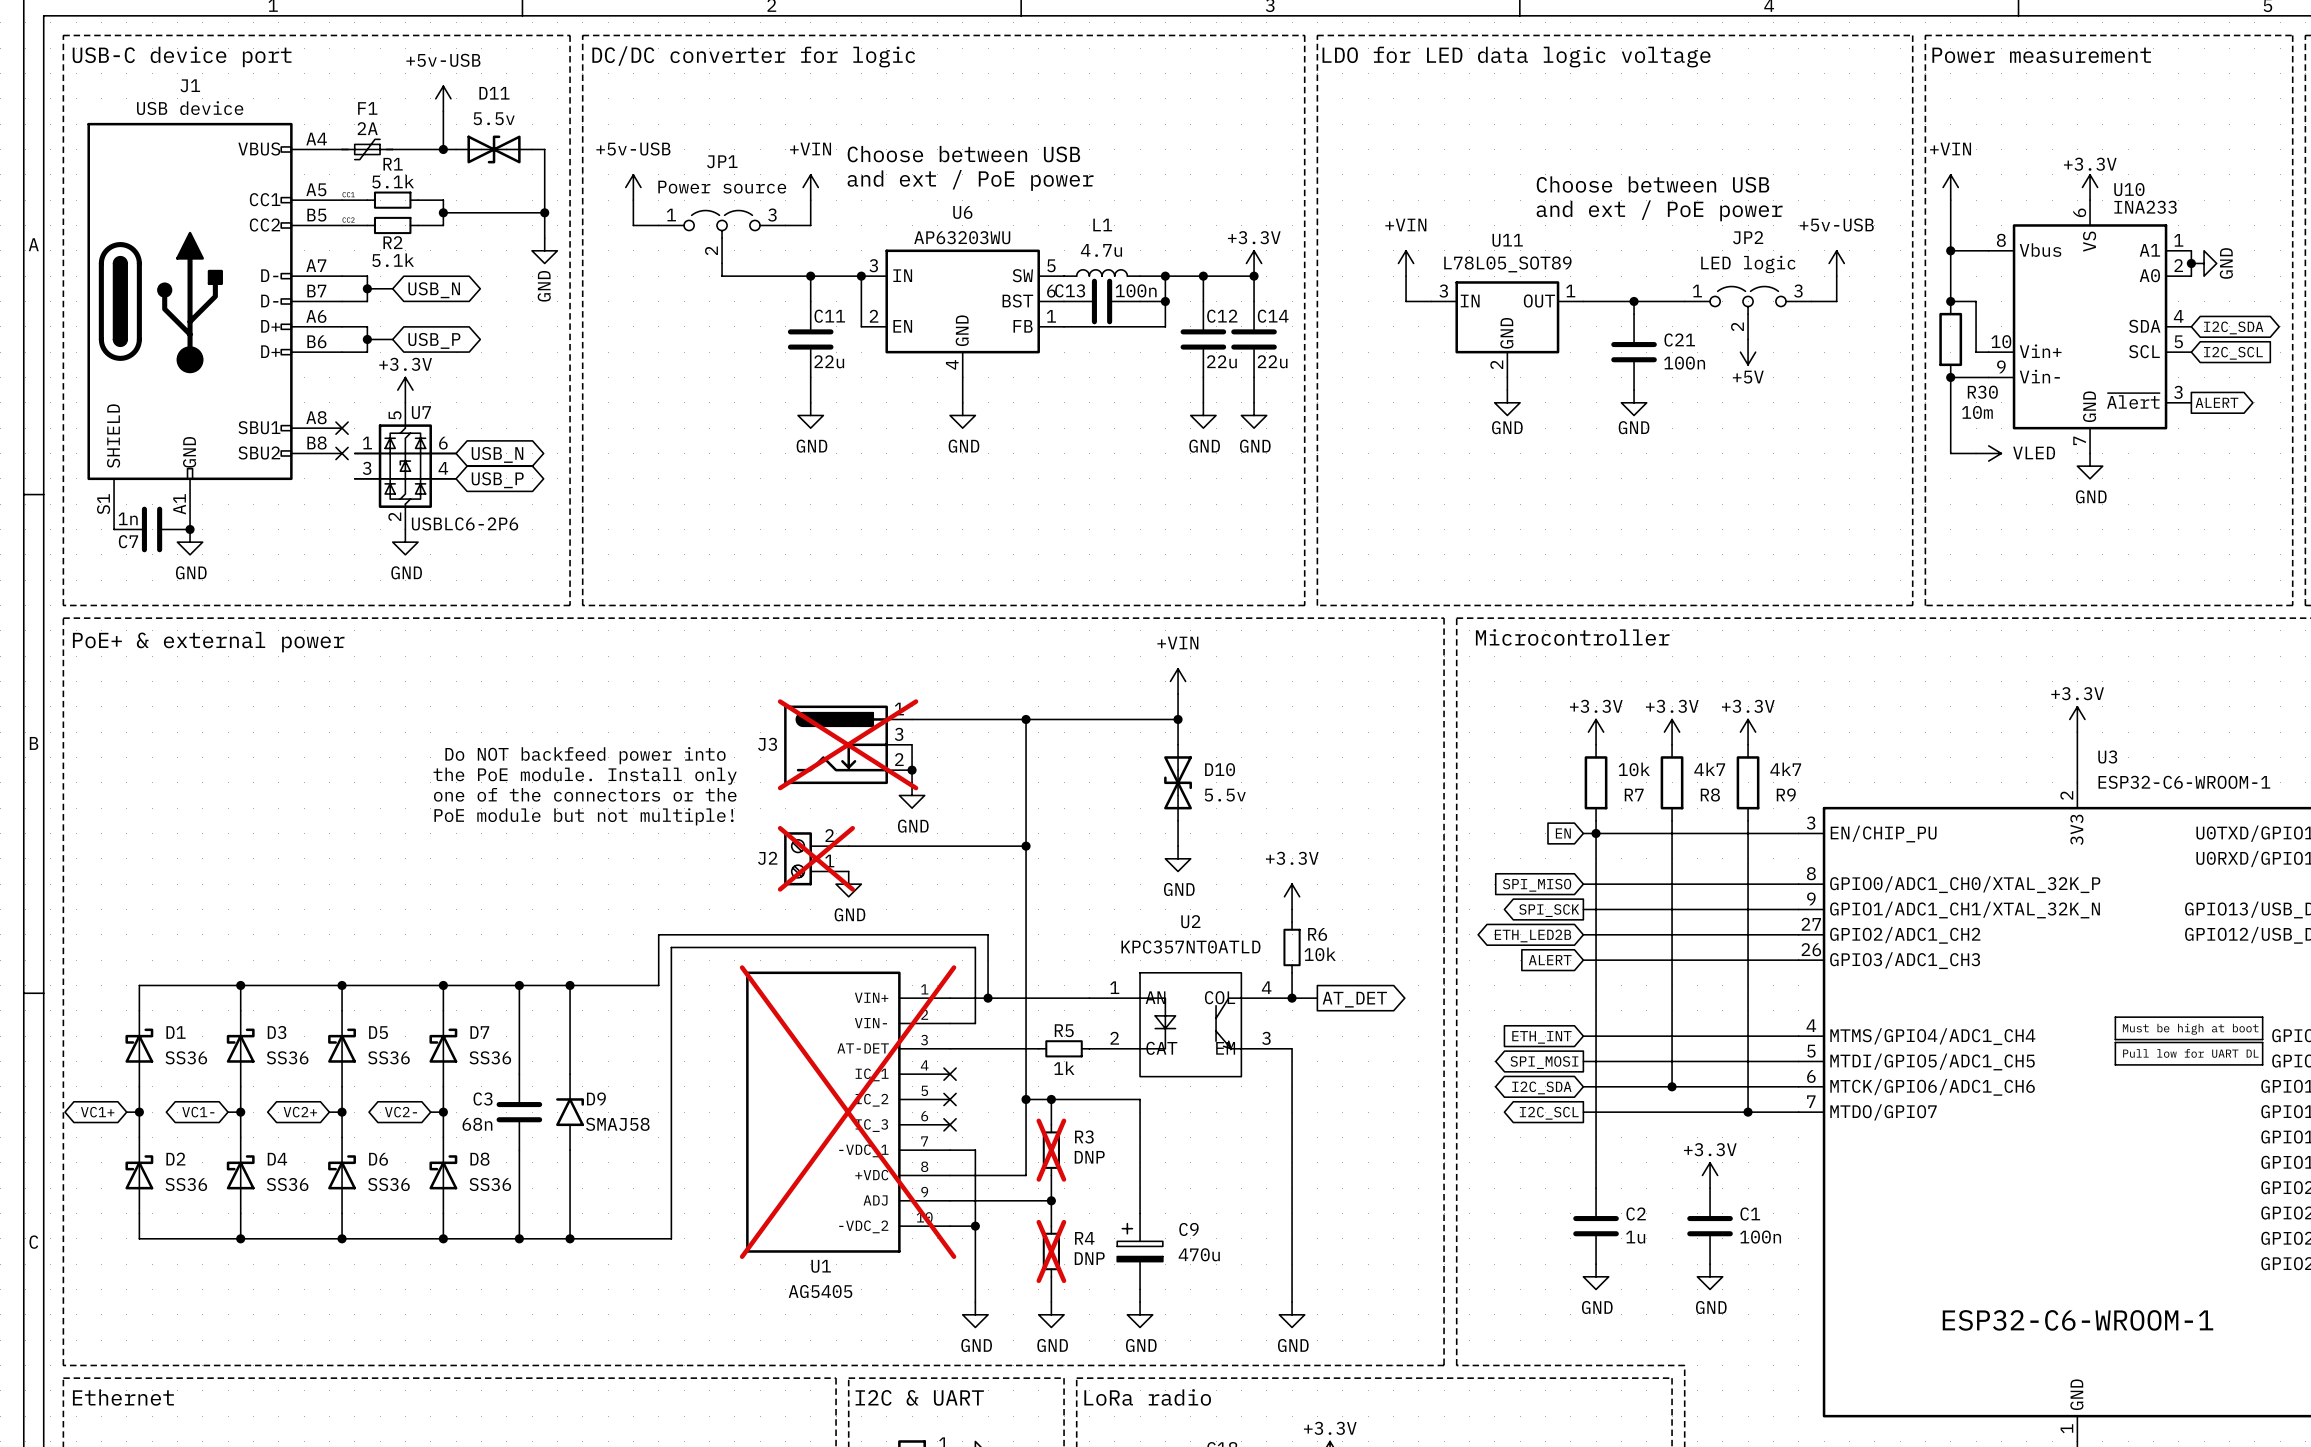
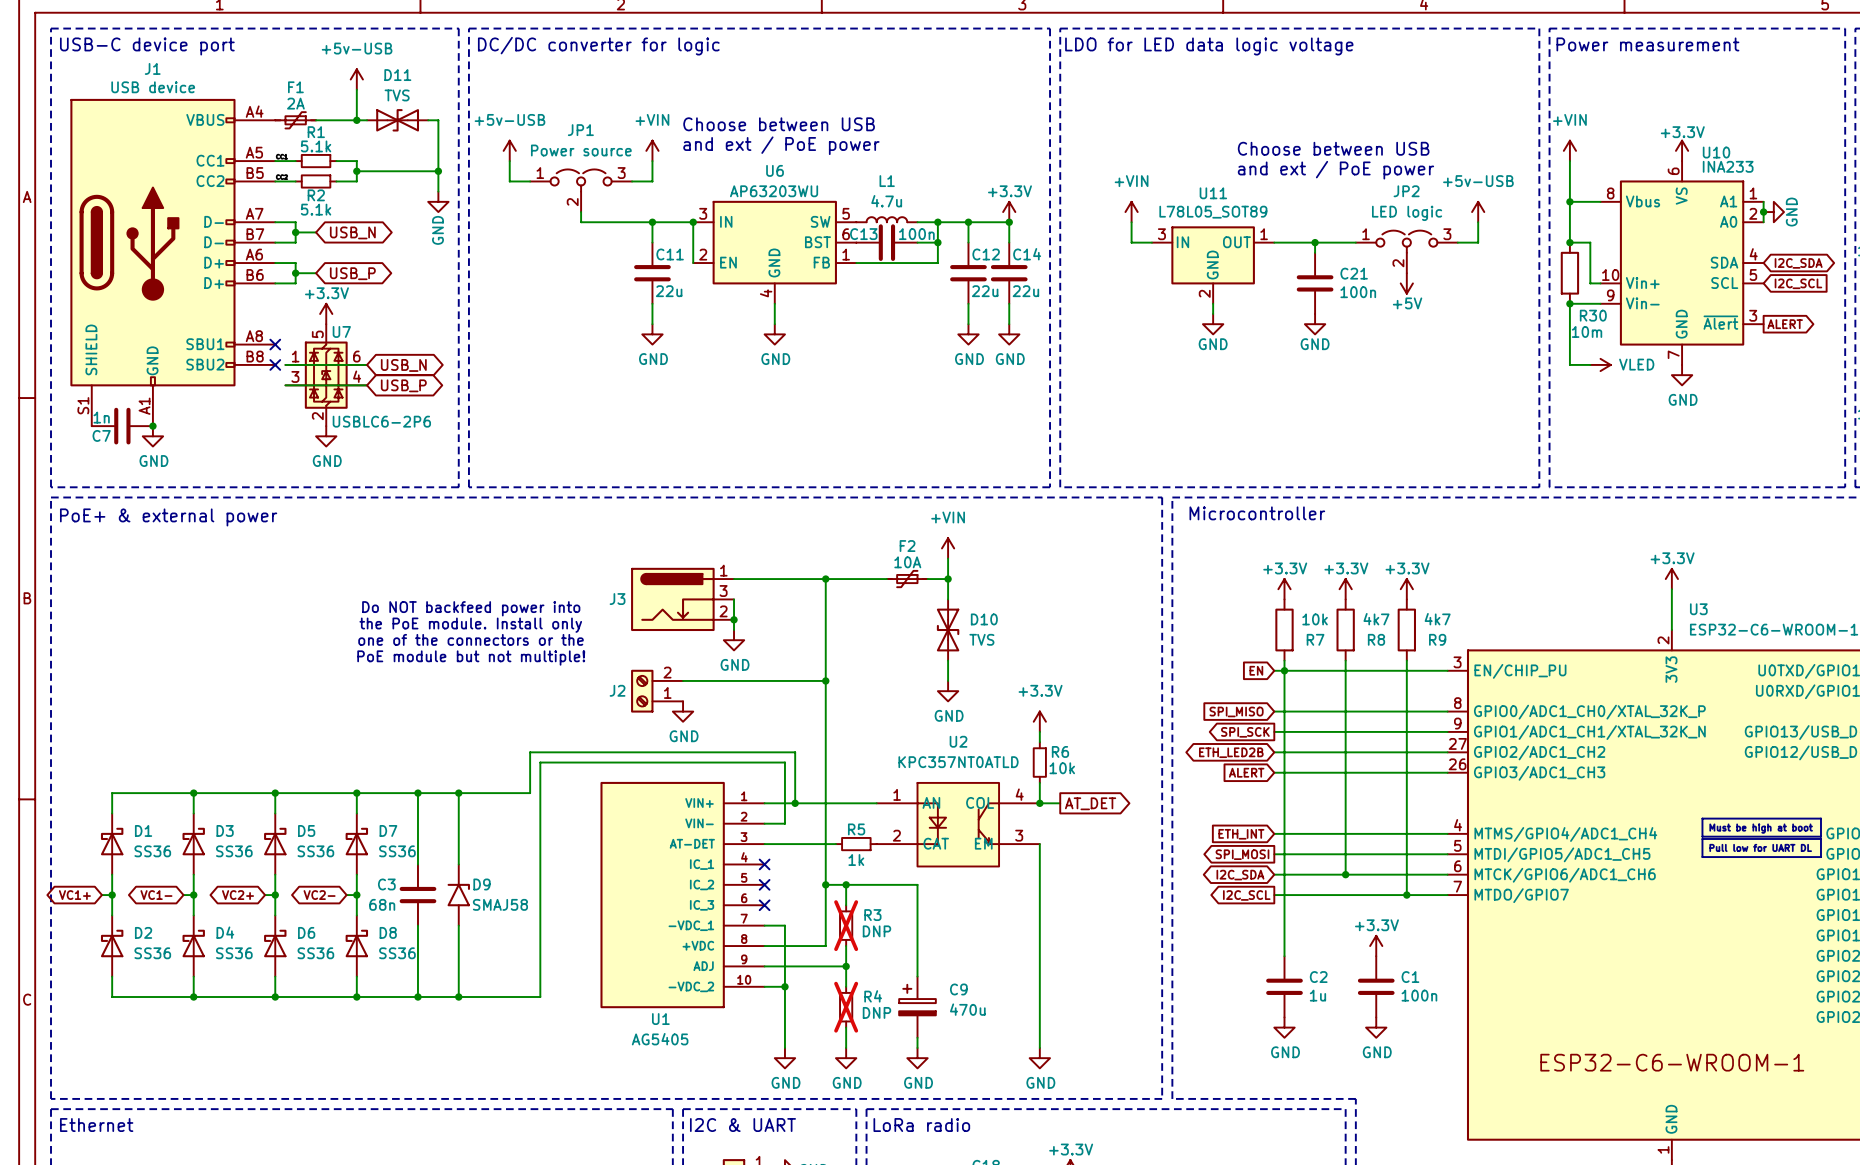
D11 value: 5.5v (494, 118) -> TVS (397, 95)
F2: none -> 10A (907, 579)
J3 do-not-place cross: (848, 744) -> none
D10 value: 5.5v (1225, 795) -> TVS (981, 639)
J2 do-not-place cross: (816, 858) -> none
U1 do-not-place cross: (848, 1112) -> none

